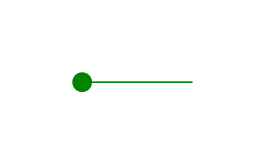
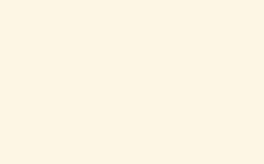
wire: (82, 82) (191, 82) -> none
junction: (82, 82) -> none

